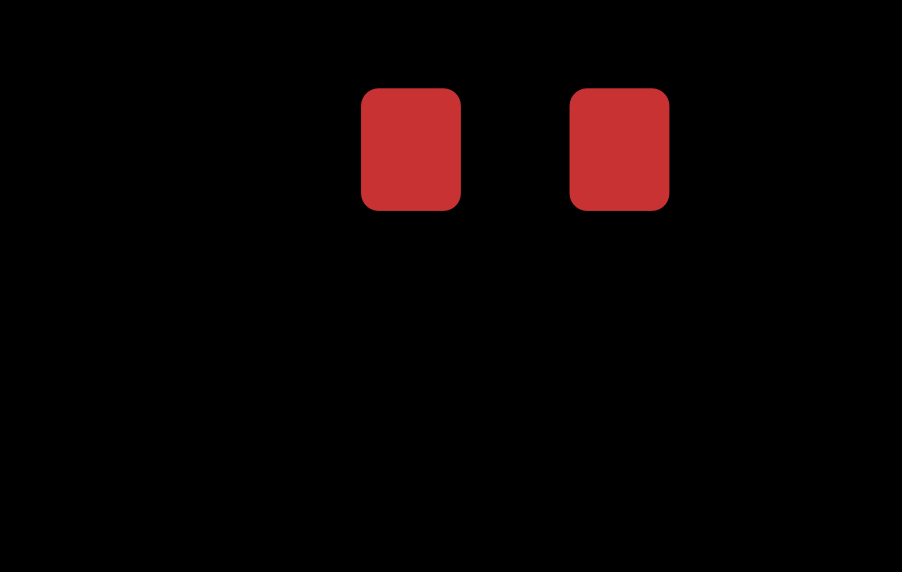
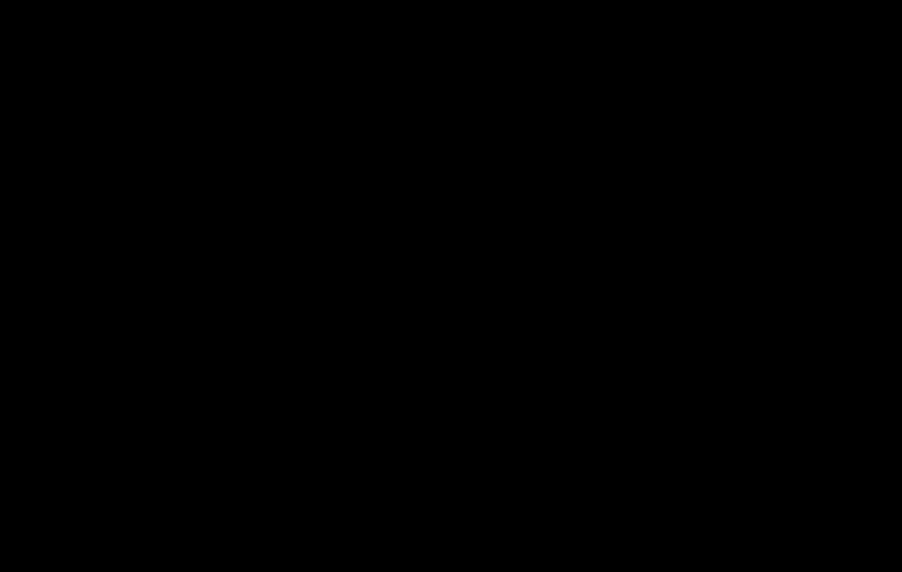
part: (515, 149) -> none

